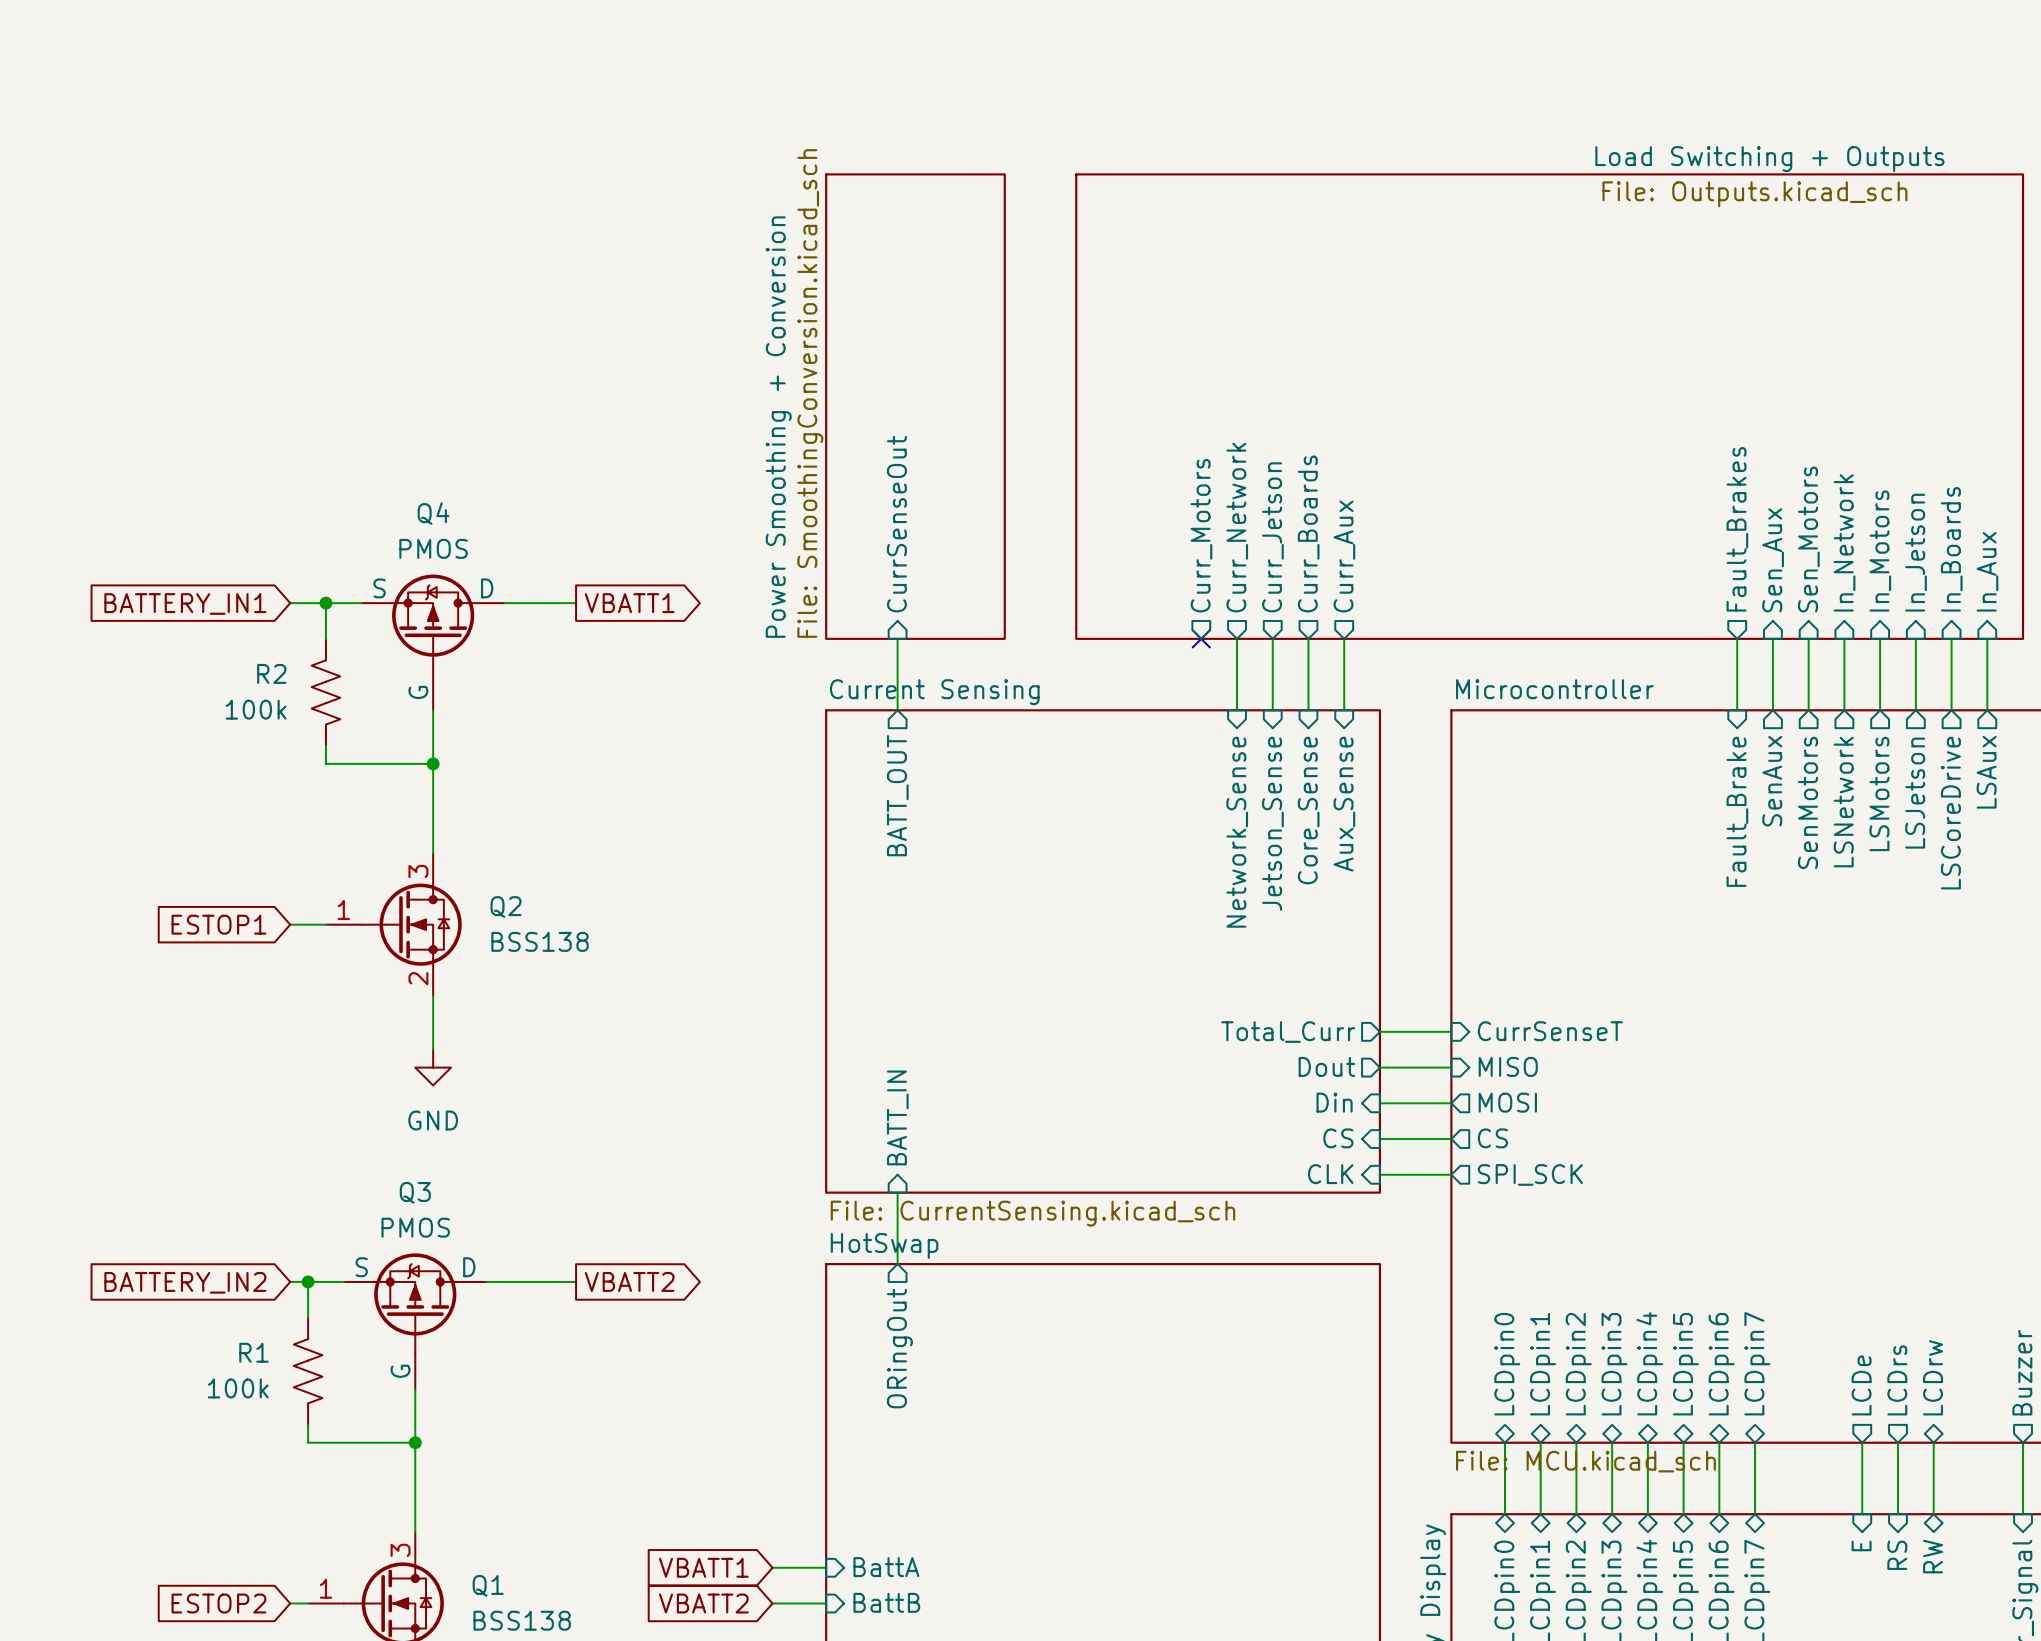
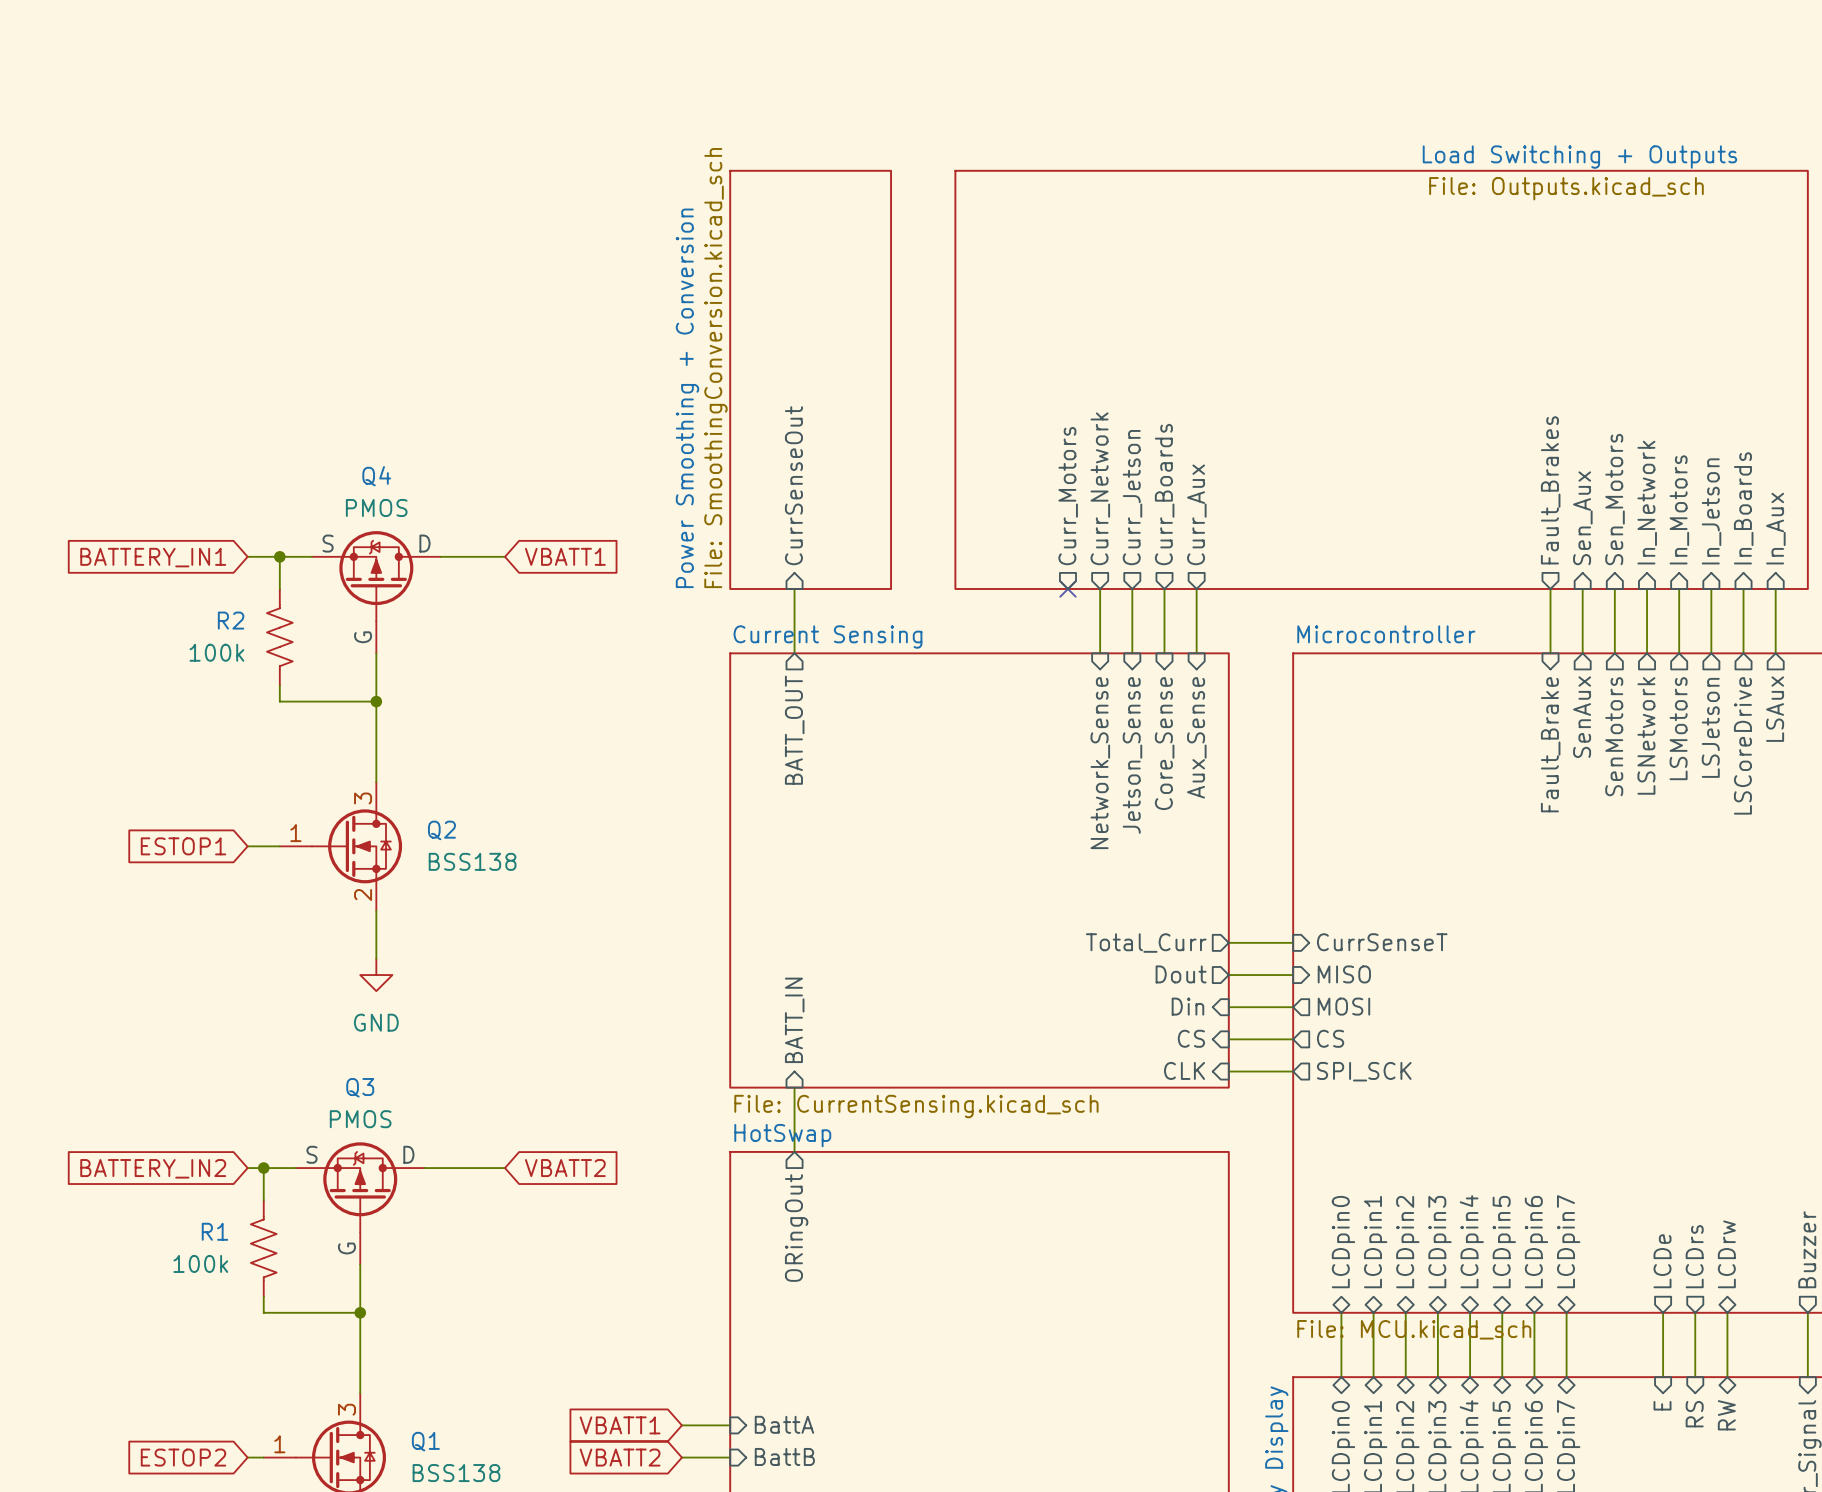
global label shape: output (629, 603) -> input (565, 556)
global label shape: output (629, 1281) -> input (565, 1168)

